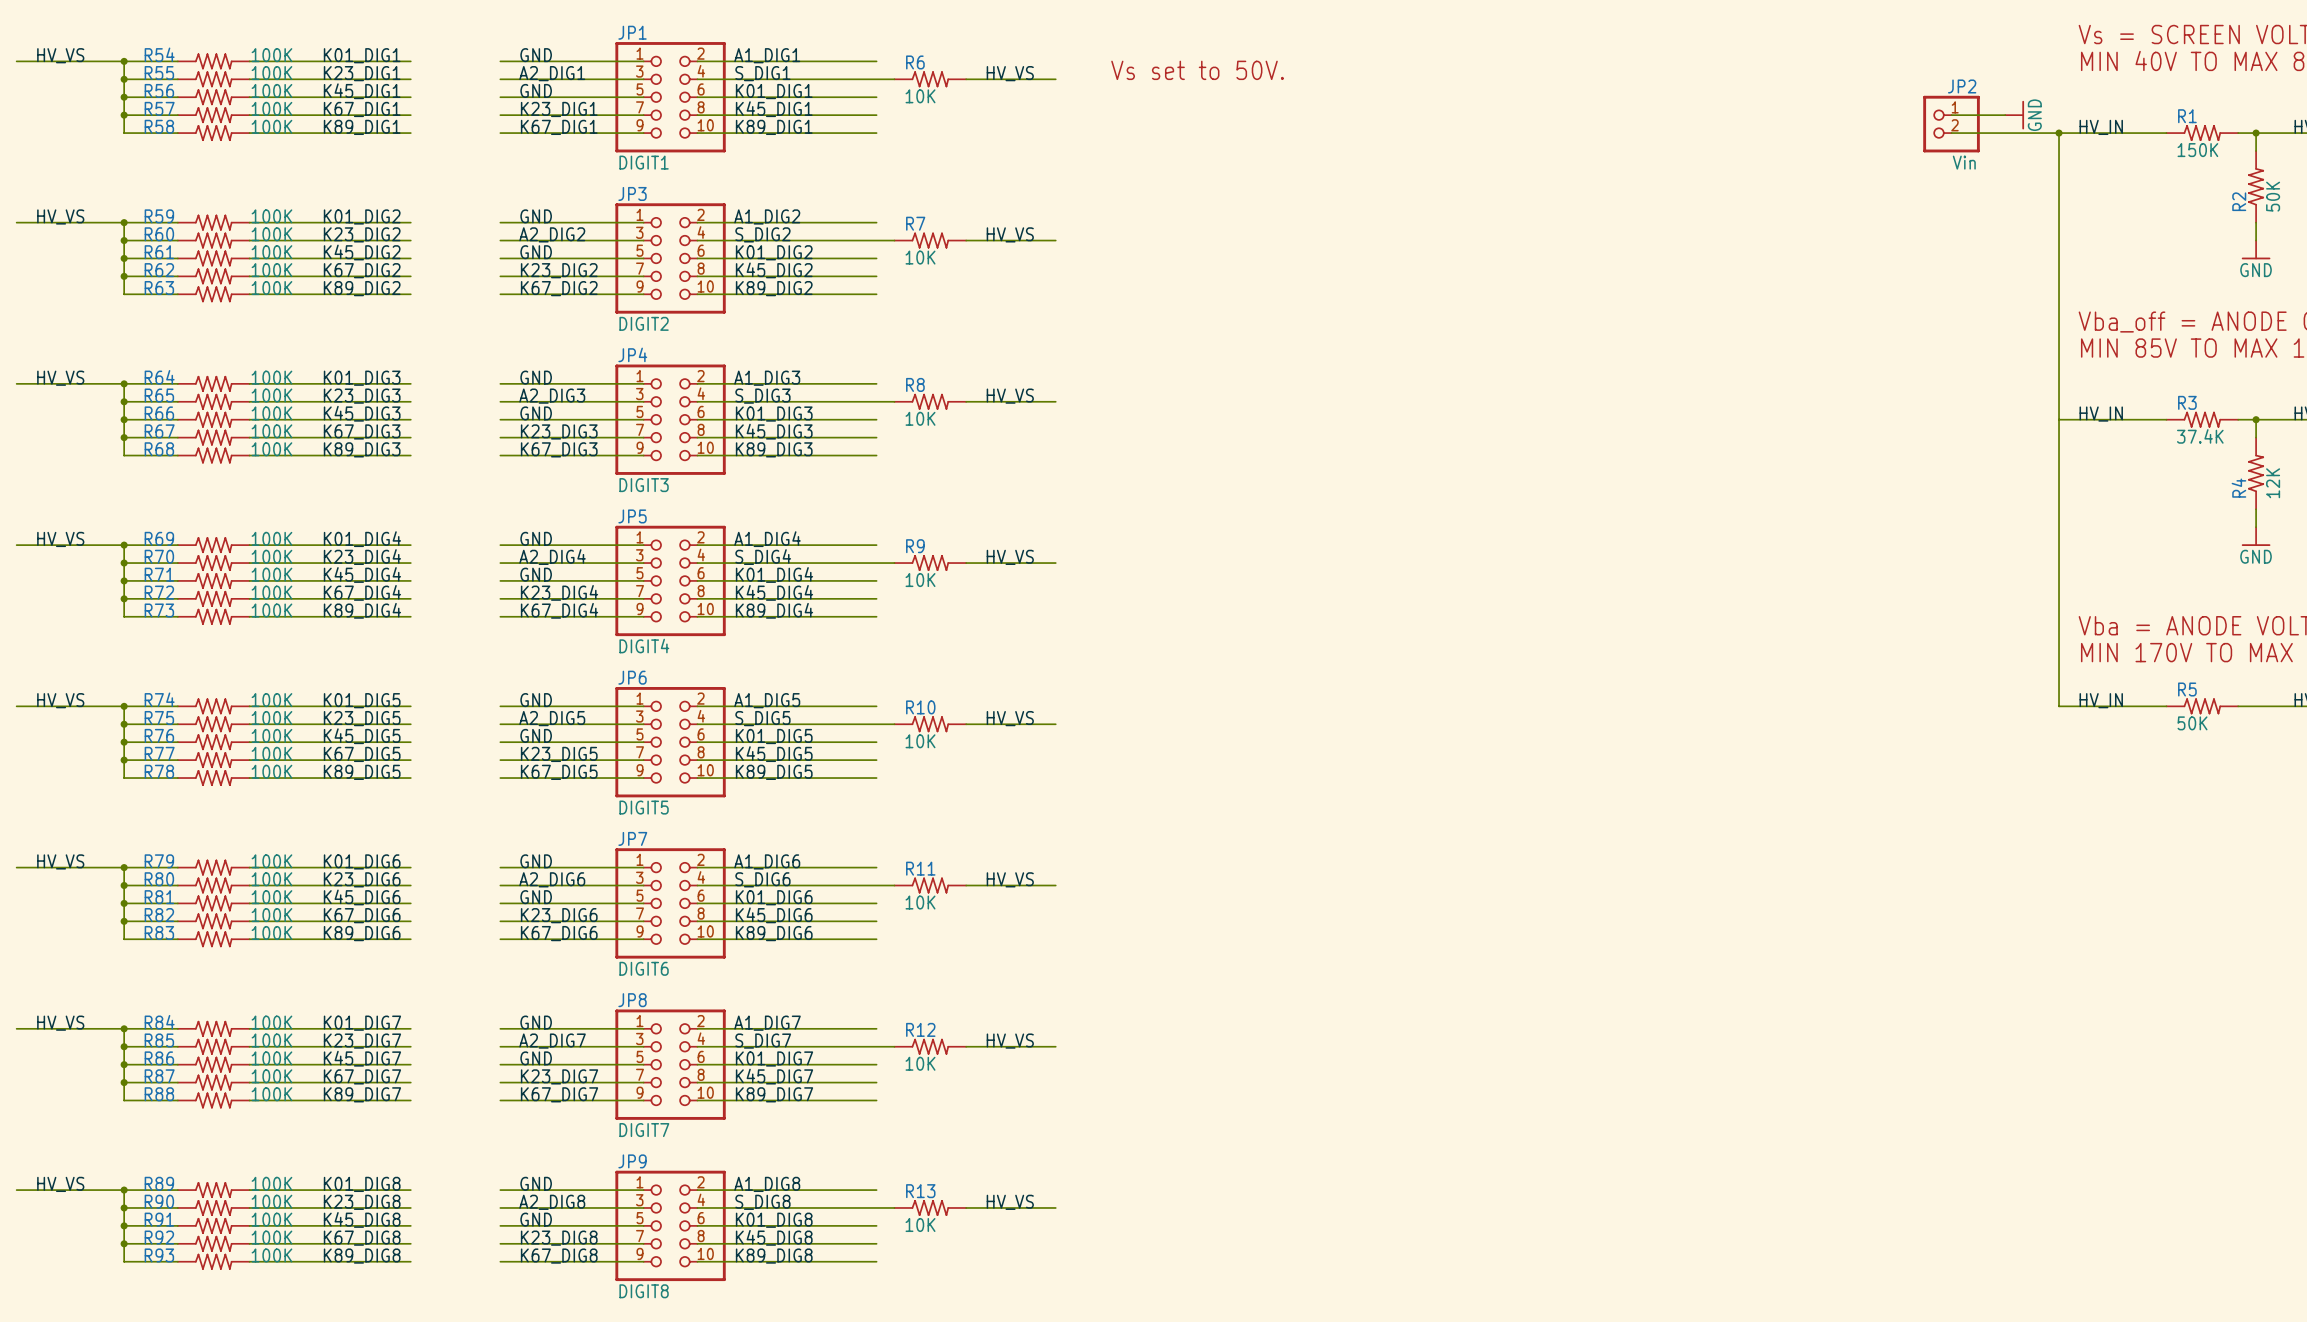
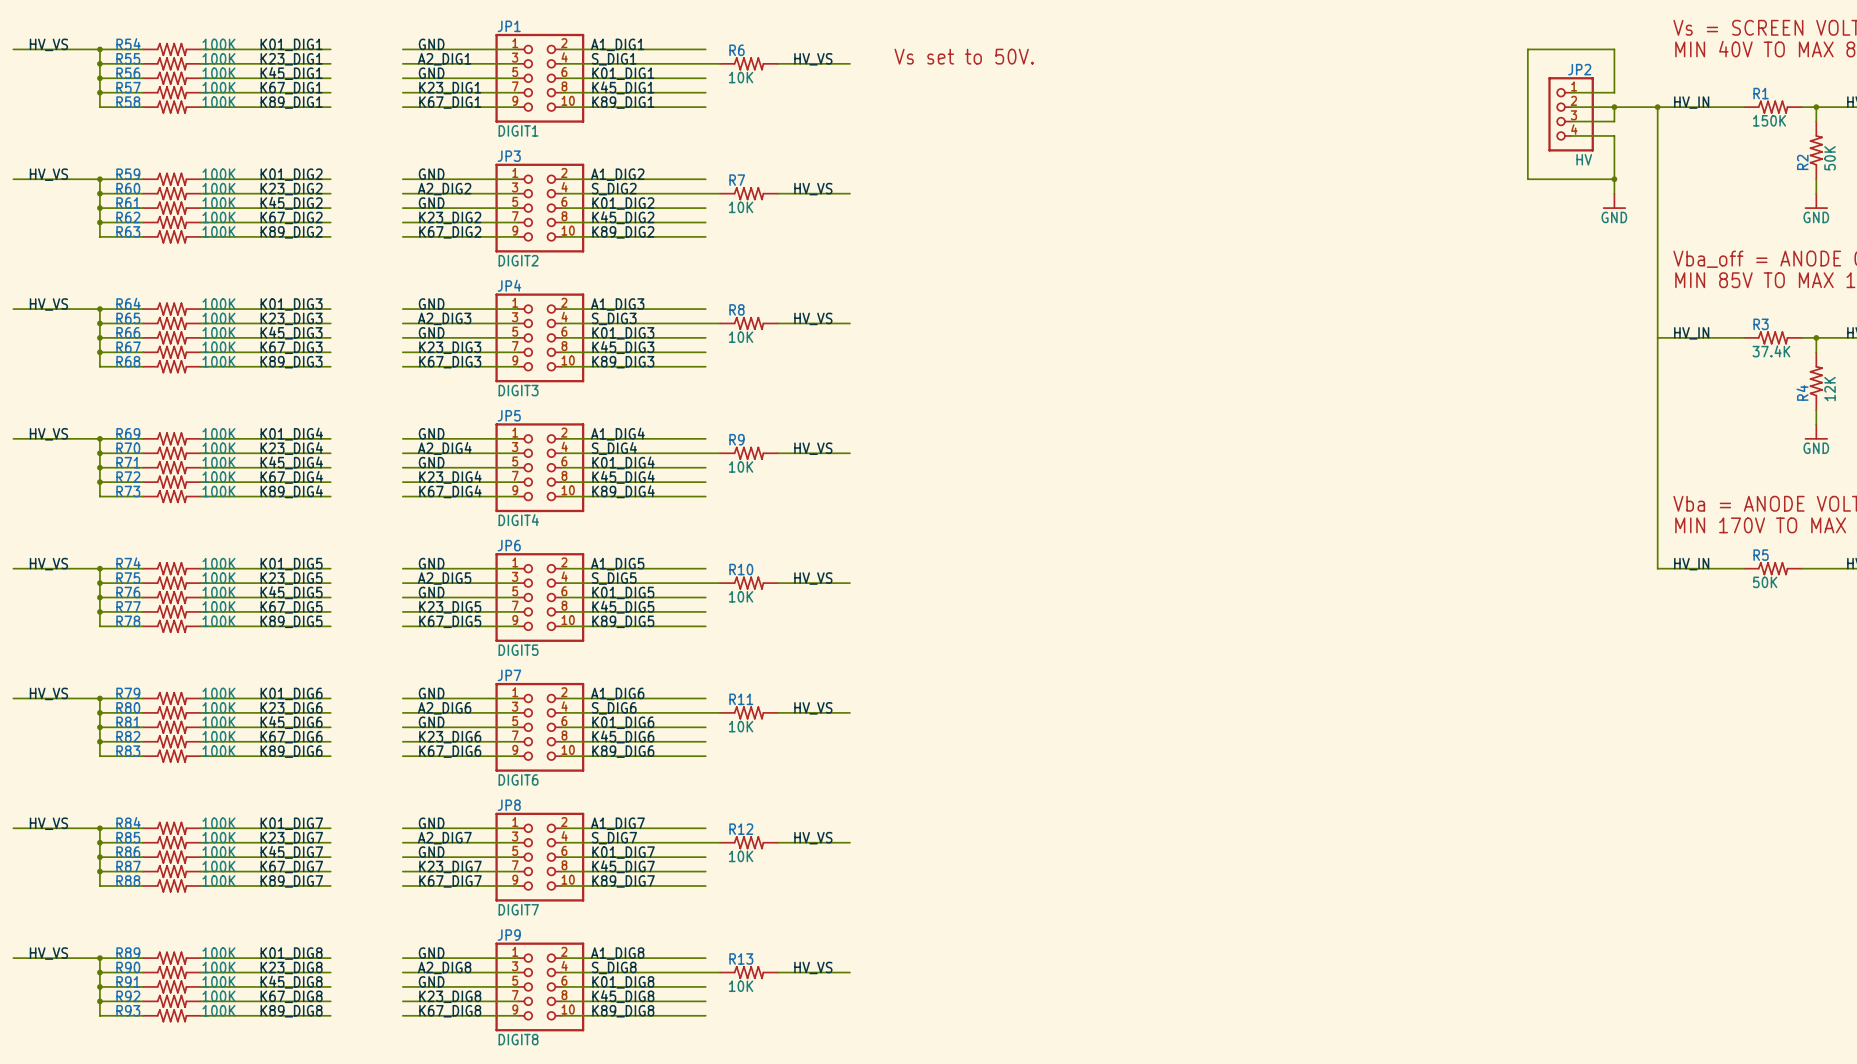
JP2 symbol: [1923, 95, 1980, 153] -> [1548, 77, 1594, 152]
wire: none -> (1614, 92) (1614, 49) (1527, 49) (1527, 179) (1614, 179)
power symbol position: GND (2014, 115) -> GND (1614, 201)
power symbol rotation: 0° (2023, 115) -> 90° clockwise (1614, 208)
wire: none -> (1614, 107) (1614, 121) (1571, 121)
junction: none -> (1614, 107)
JP2 value: Vin (1964, 162) -> HV (1584, 159)
wire: none -> (1571, 135) (1614, 135) (1614, 193)
junction: none -> (1614, 179)

